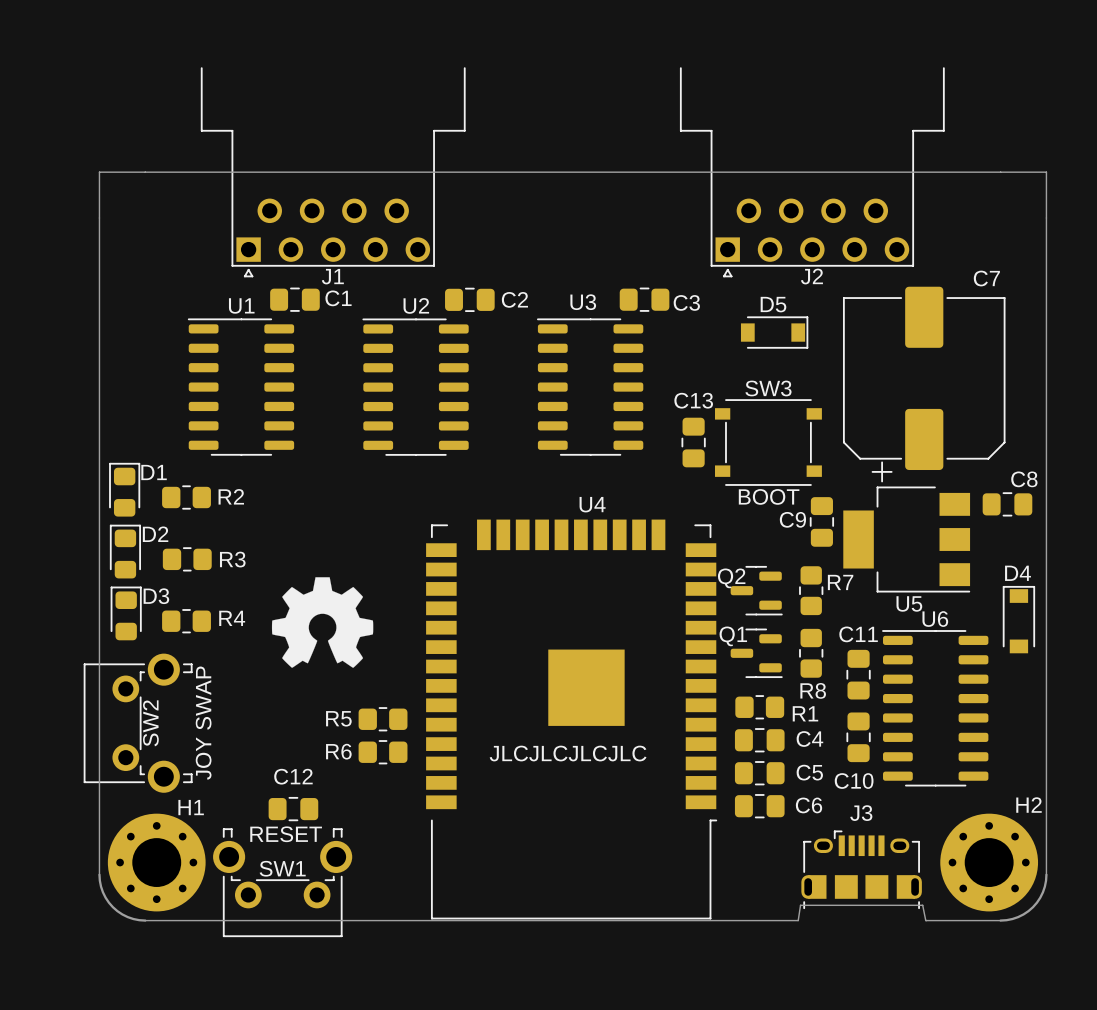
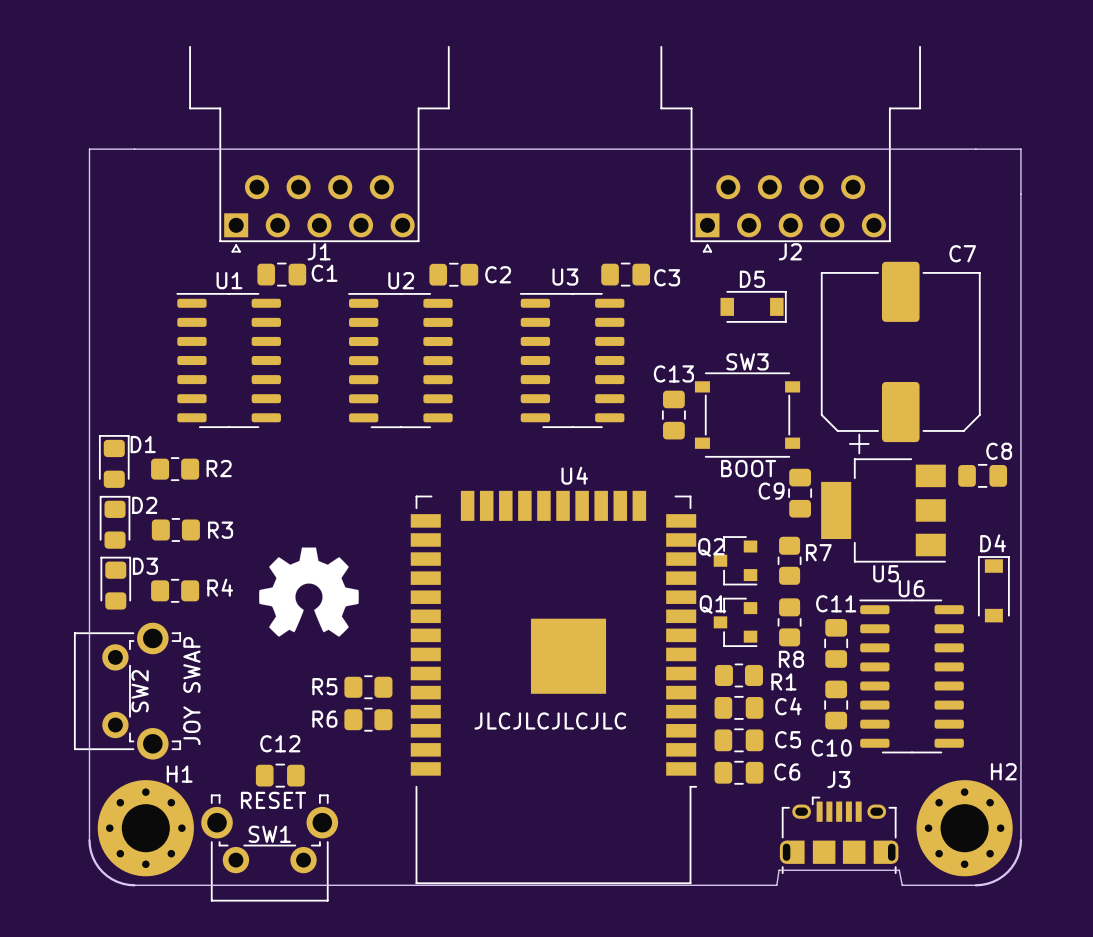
Q2 footprint: [730, 565, 783, 616] -> [713, 536, 758, 586]
Q1 footprint: [730, 628, 783, 679] -> [713, 597, 758, 648]

